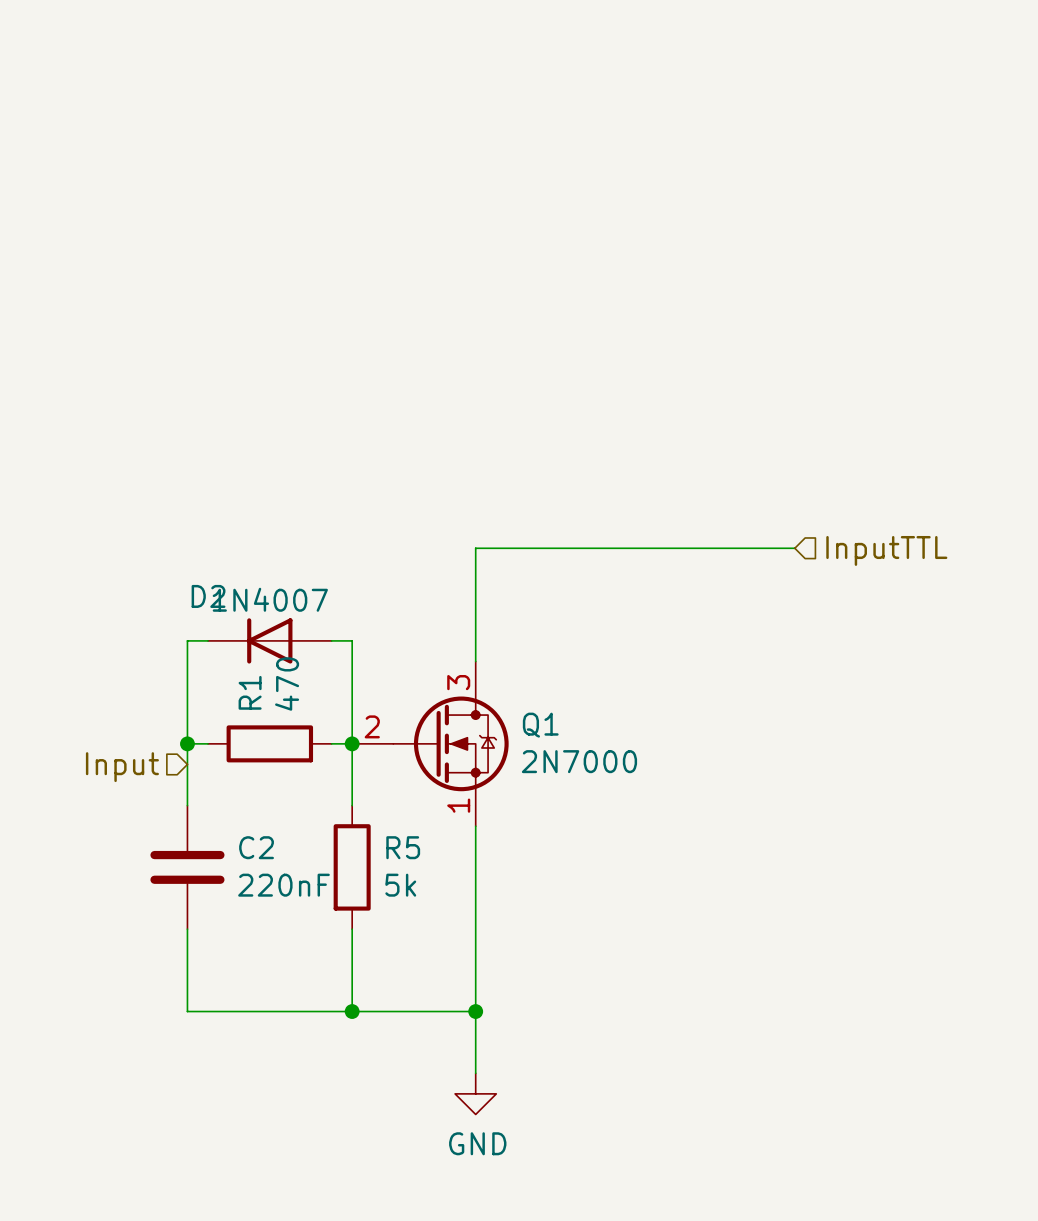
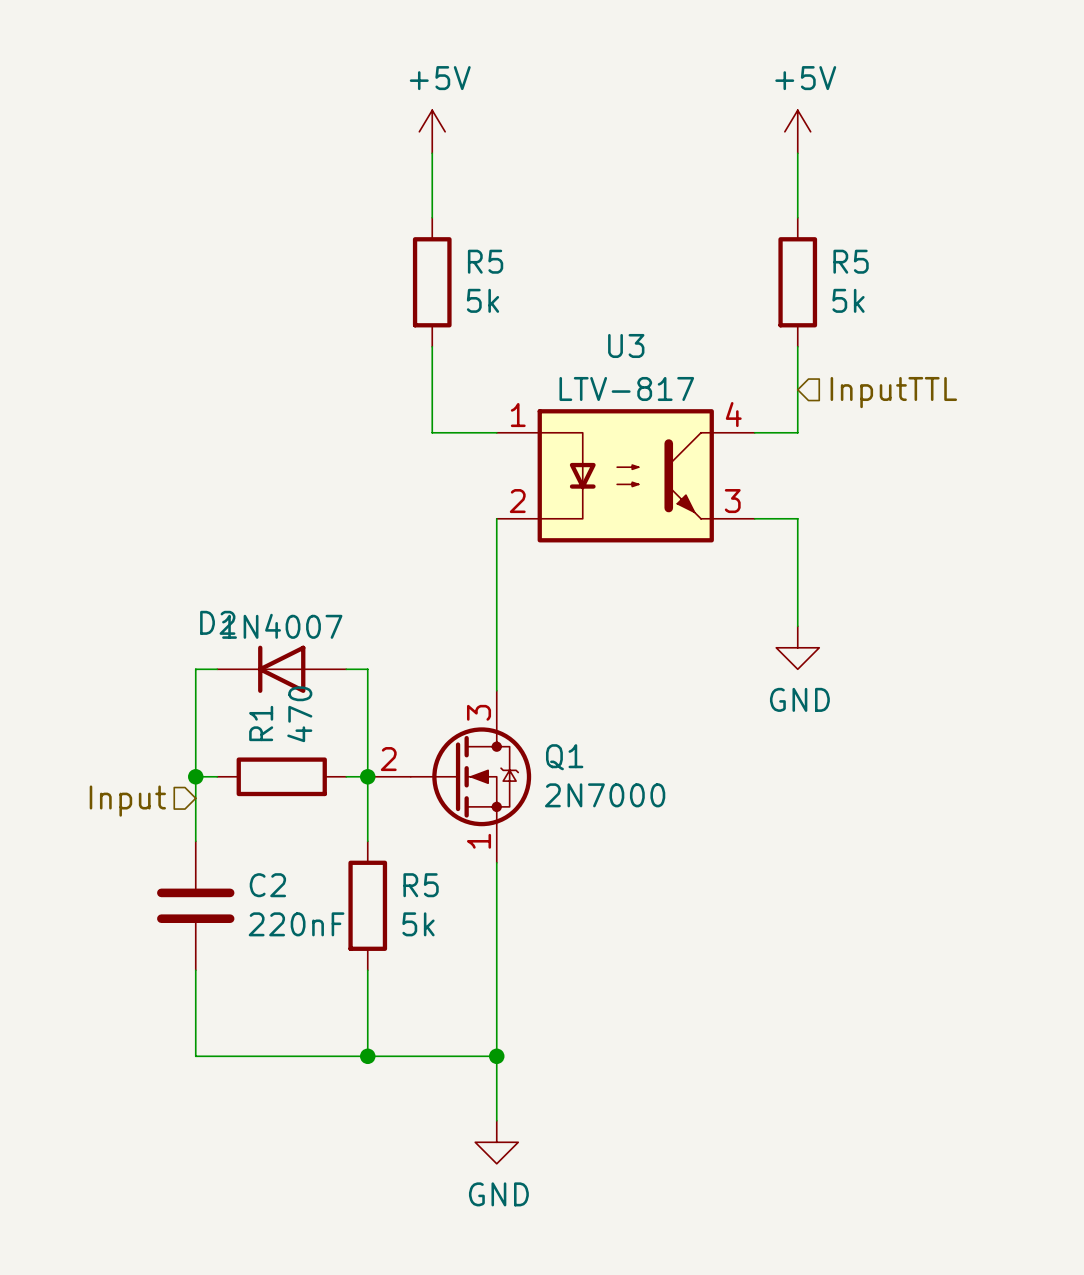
power symbol: none -> +5V (432, 131)
power symbol: none -> +5V (797, 131)
wire: none -> (432, 153) (432, 217)
wire: none -> (797, 153) (797, 217)
R5: none -> 5k (432, 282)
R5: none -> 5k (797, 282)
wire: none -> (432, 346) (432, 432) (496, 432)
wire: none -> (797, 346) (797, 432) (754, 432)
U3: none -> LTV-817 (625, 475)
wire: none -> (754, 518) (797, 518) (797, 626)
wire: (475, 548) (794, 548) -> (496, 572) (496, 518)
hierarchical label position: InputTTL (886, 550) -> InputTTL (893, 392)
power symbol: none -> GND (797, 647)

